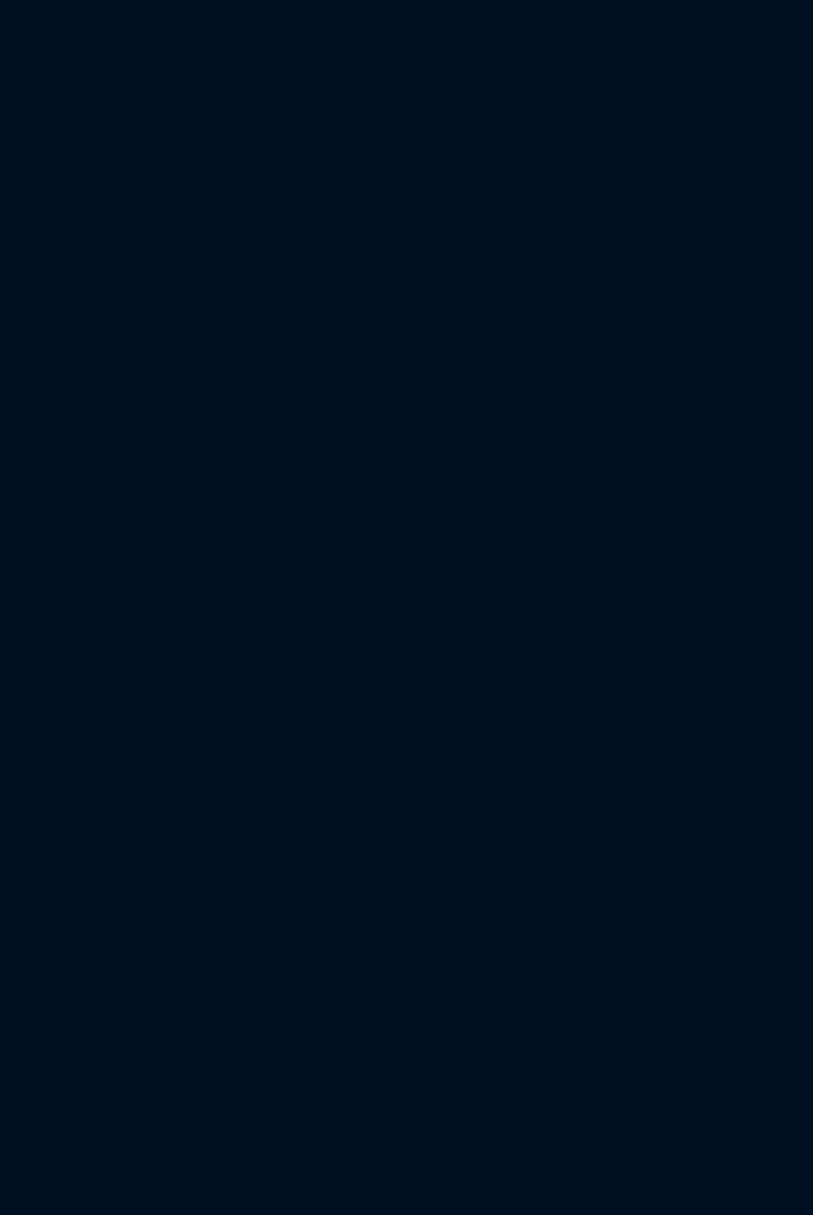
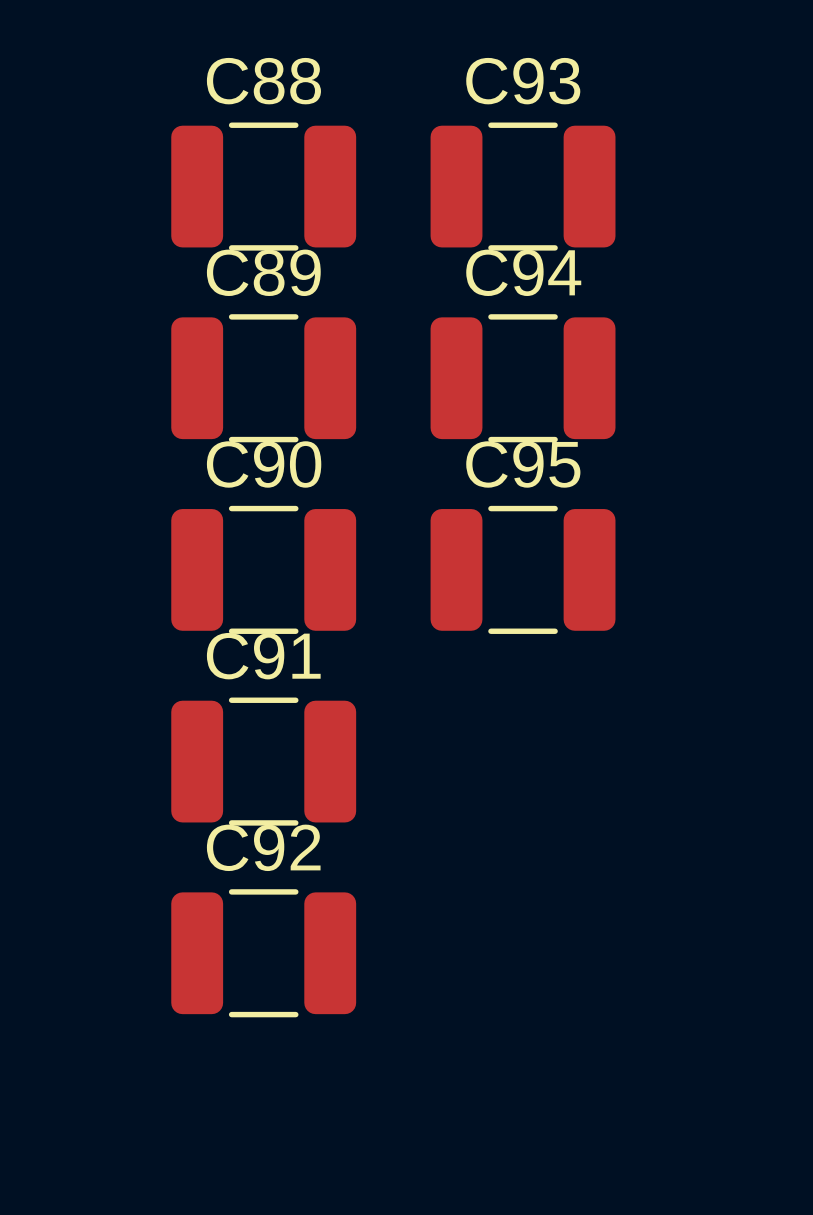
C88: none -> (263, 186)
C93: none -> (523, 186)
C89: none -> (263, 378)
C94: none -> (523, 378)
C90: none -> (263, 569)
C95: none -> (523, 569)
C91: none -> (263, 761)
C92: none -> (263, 953)

